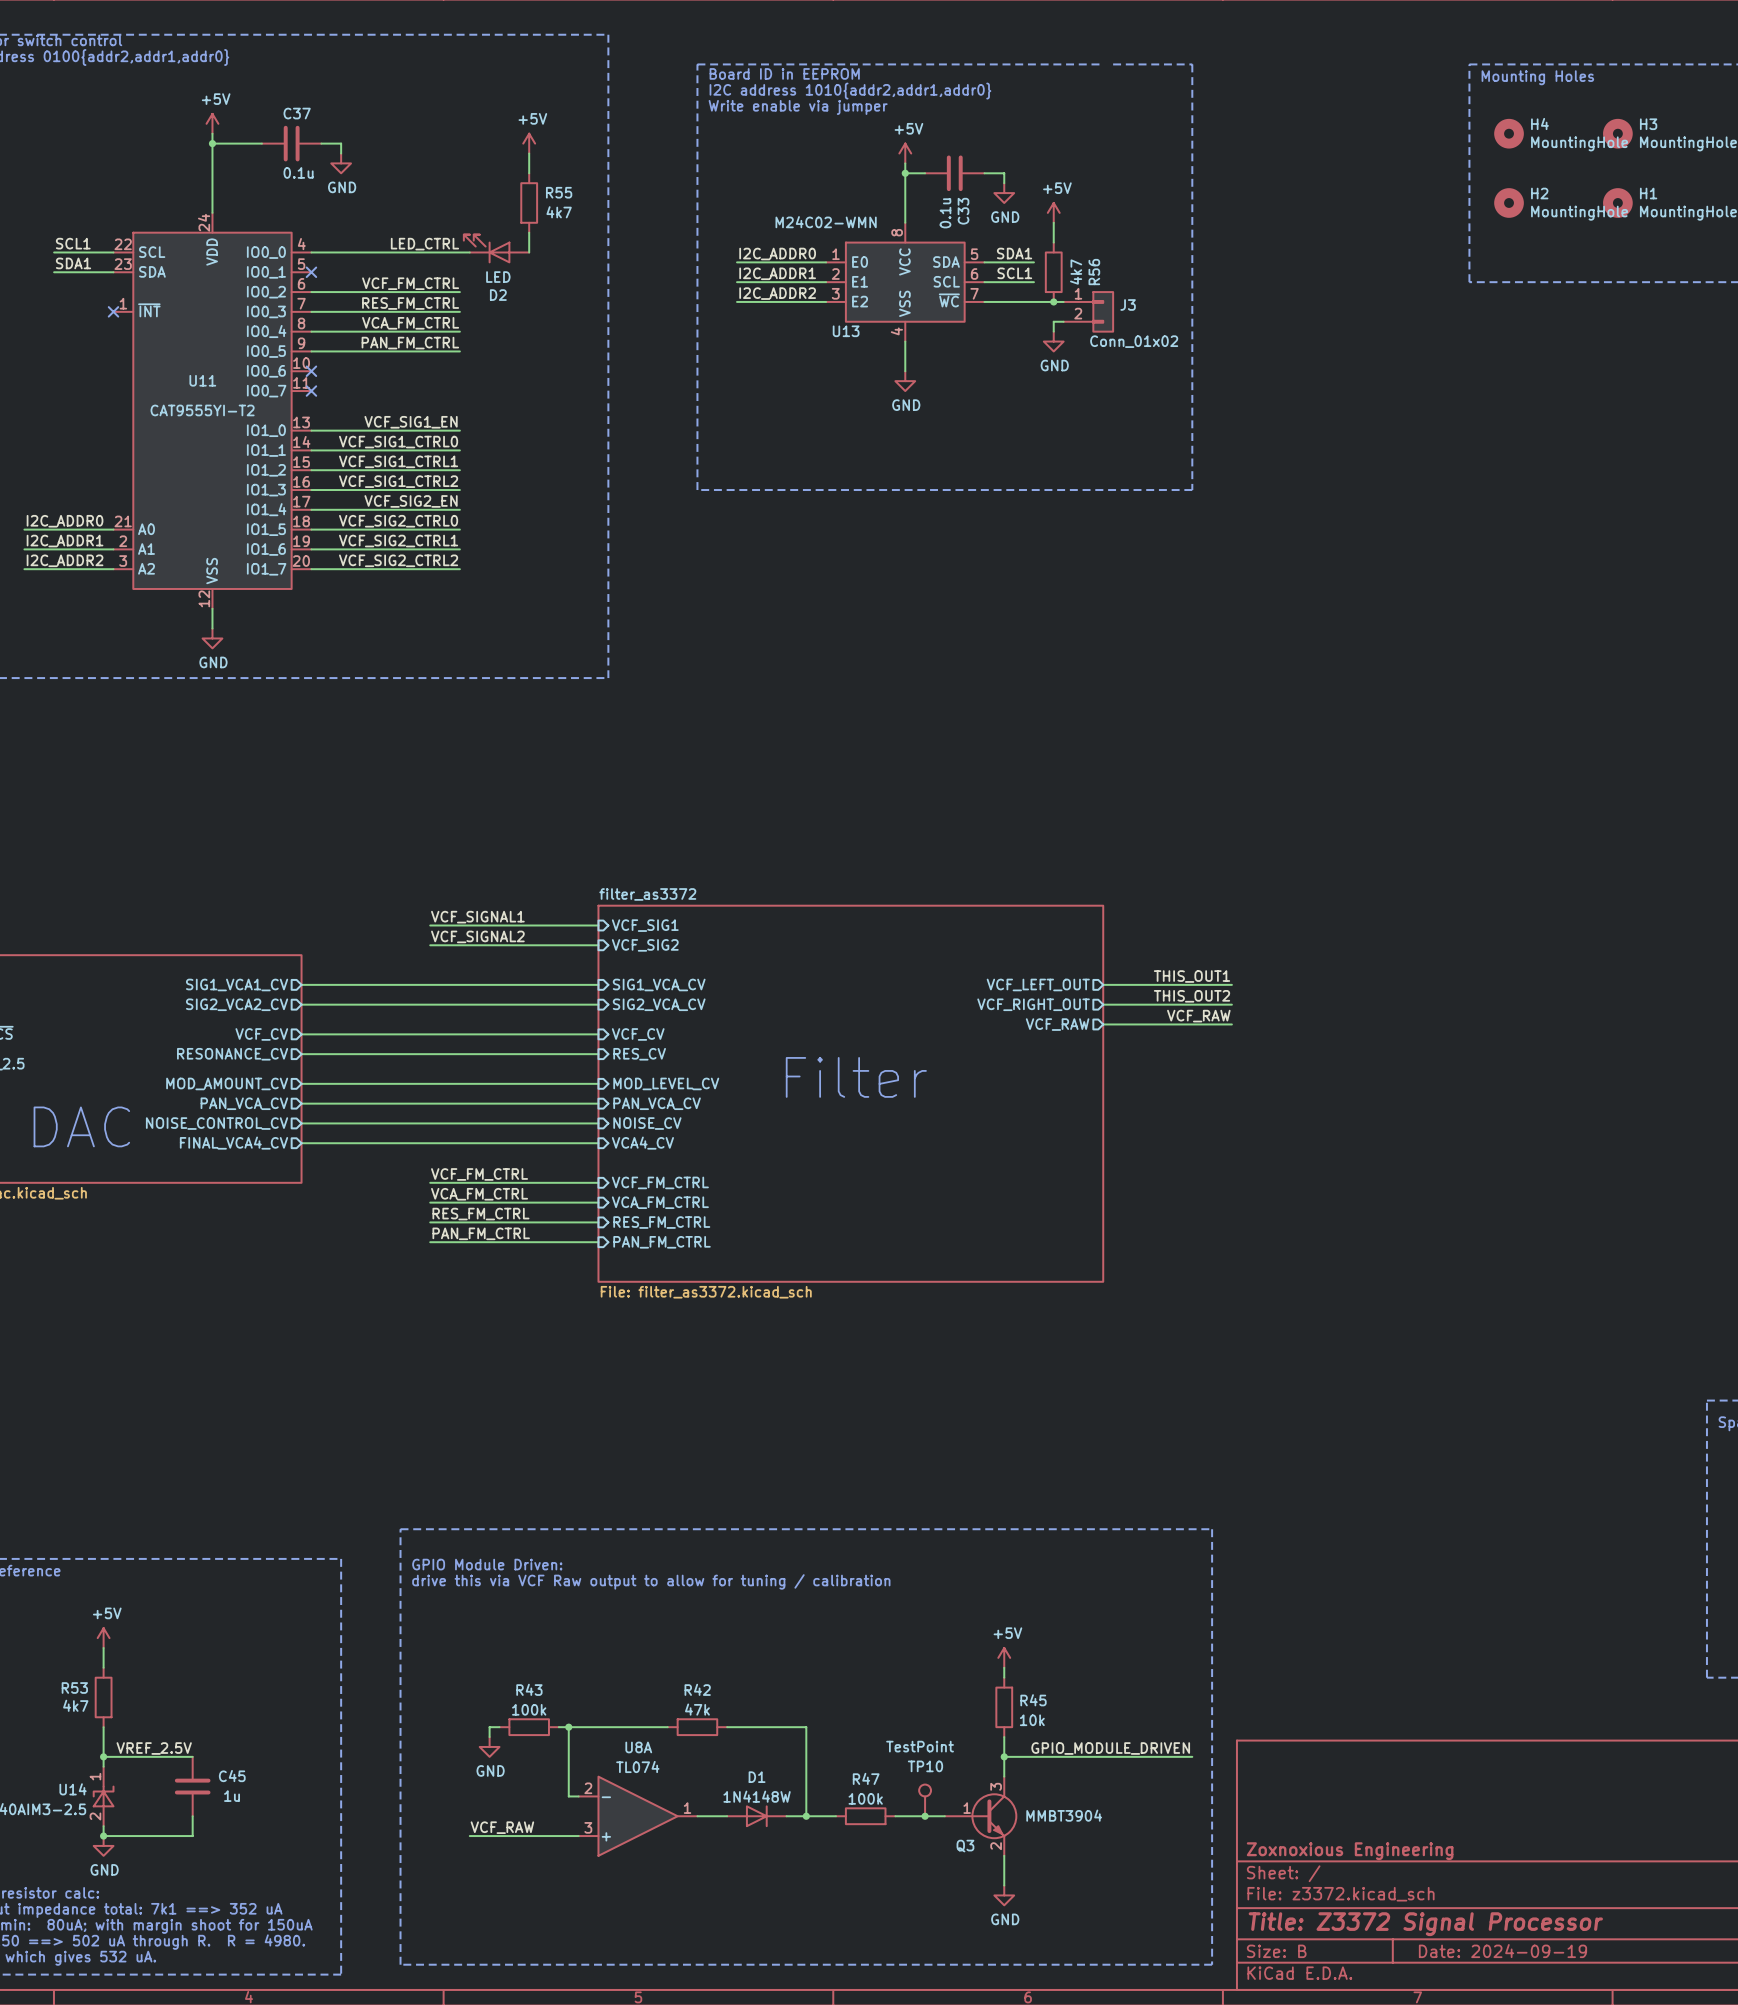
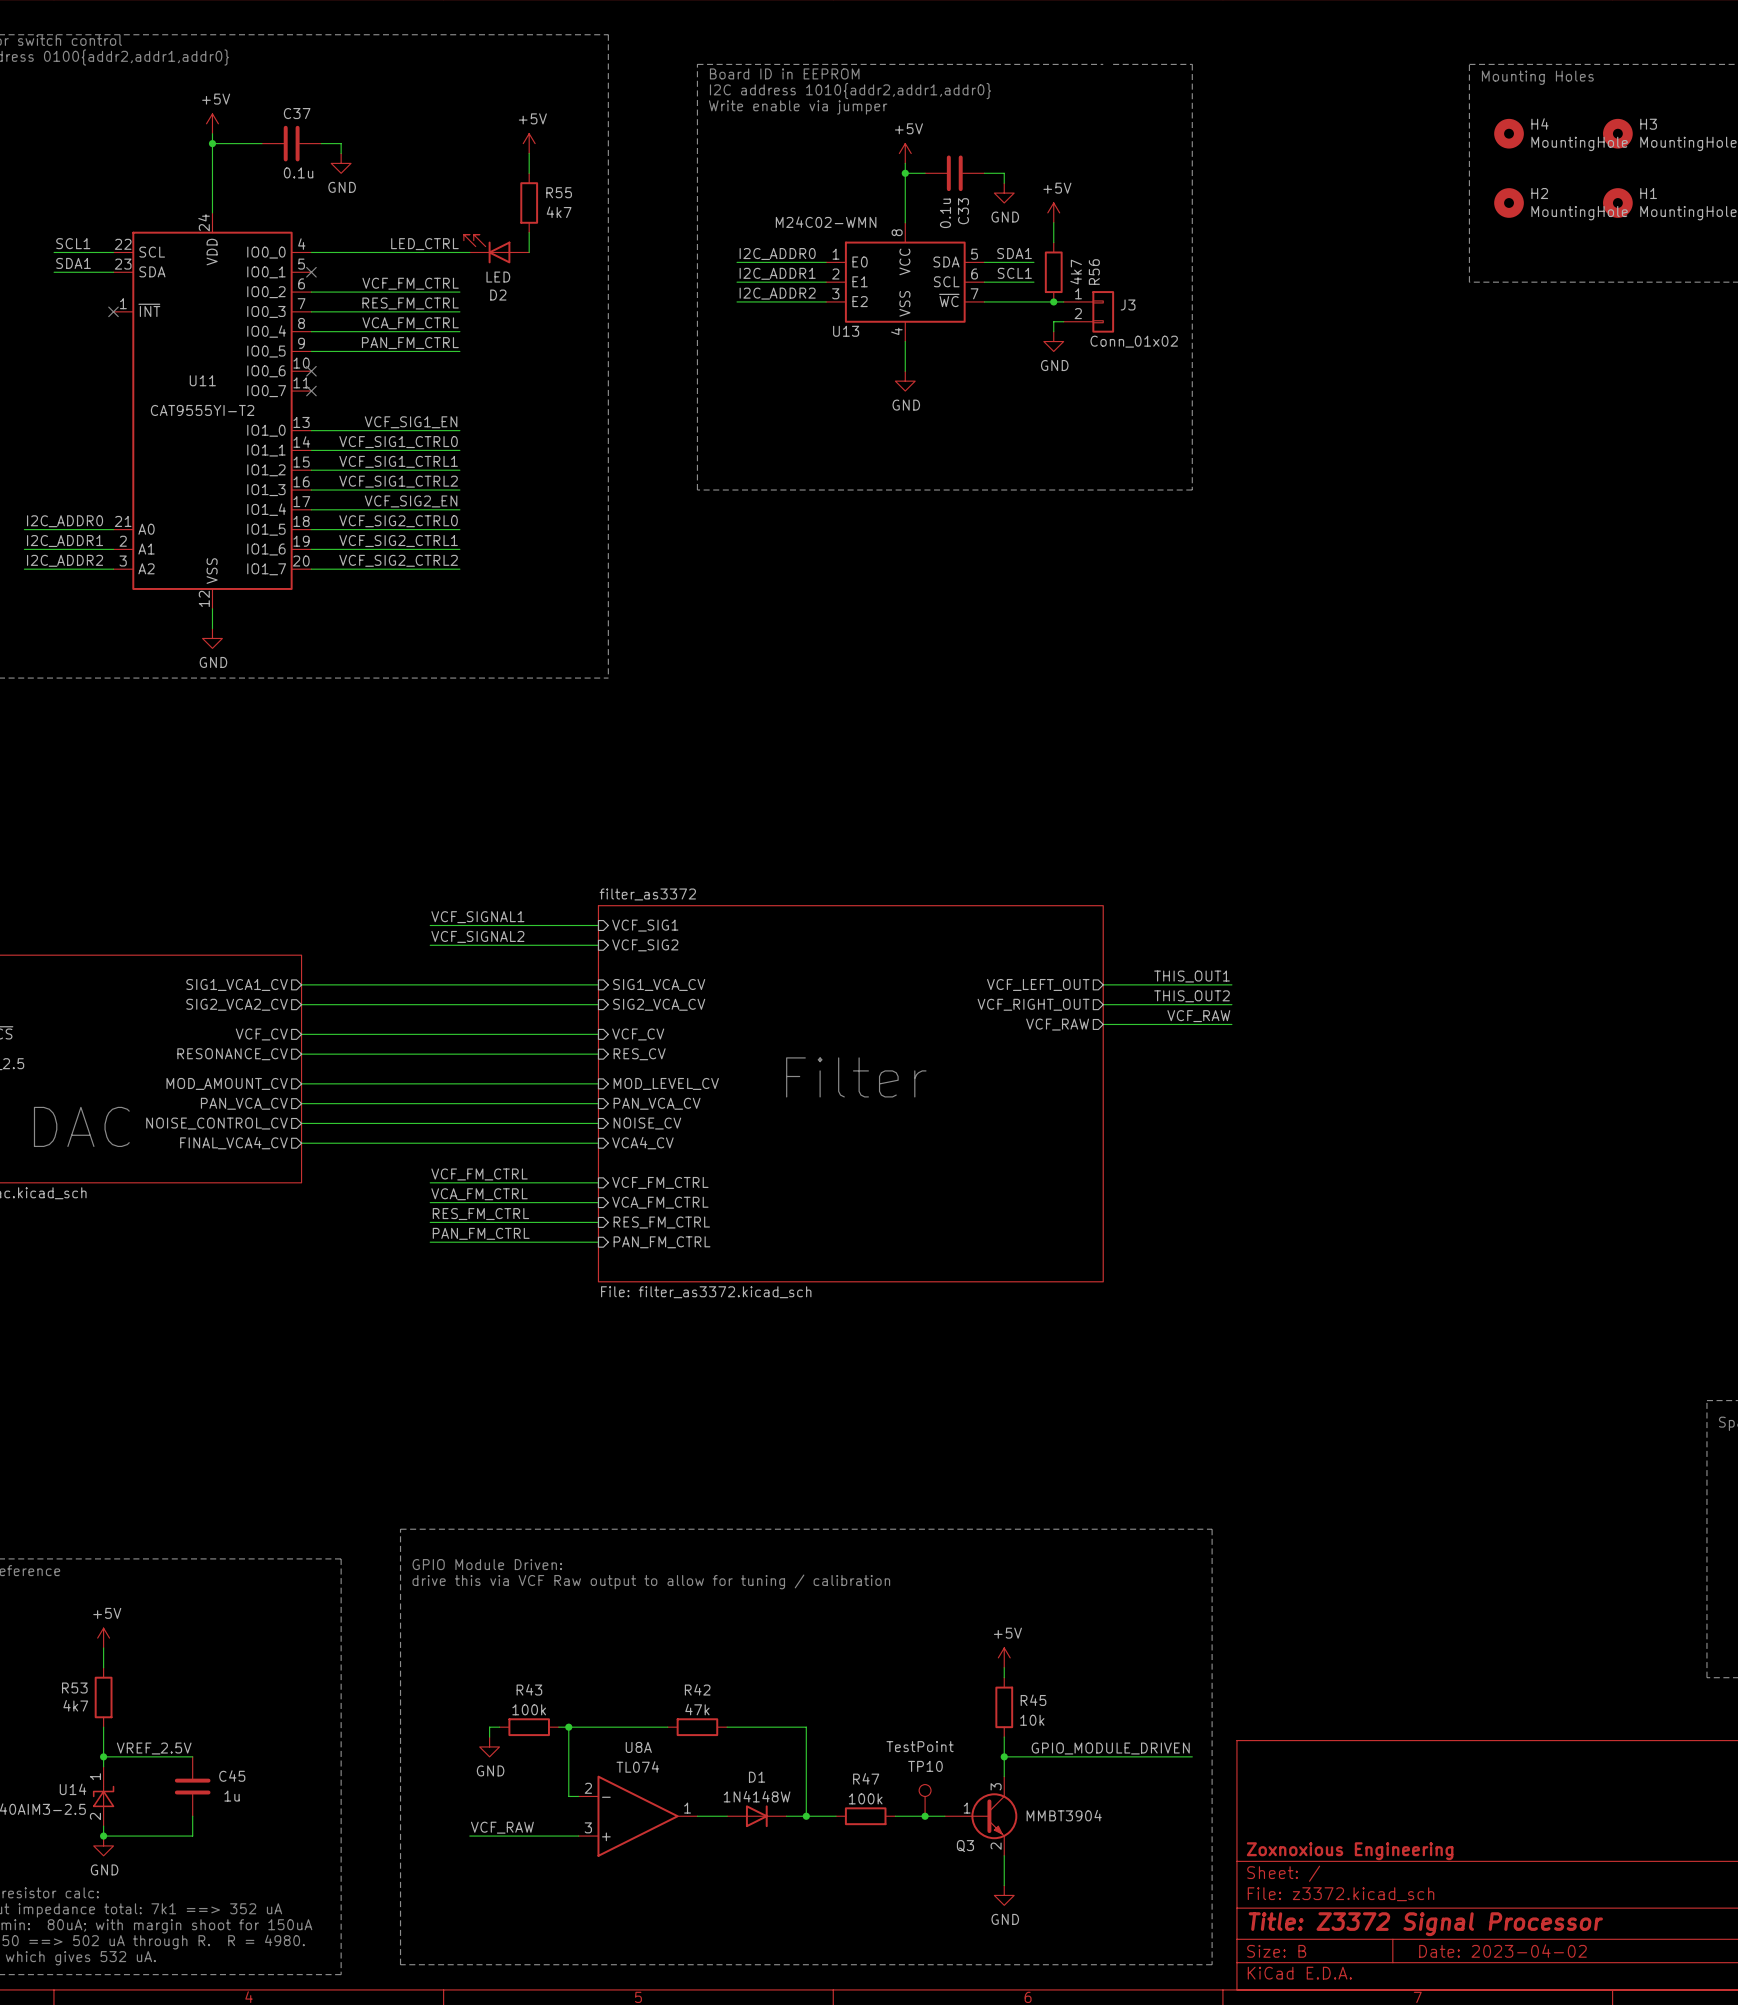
title block: Date: 2024-09-19 (1502, 1951) -> Date: 2023-04-02 (1502, 1951)

